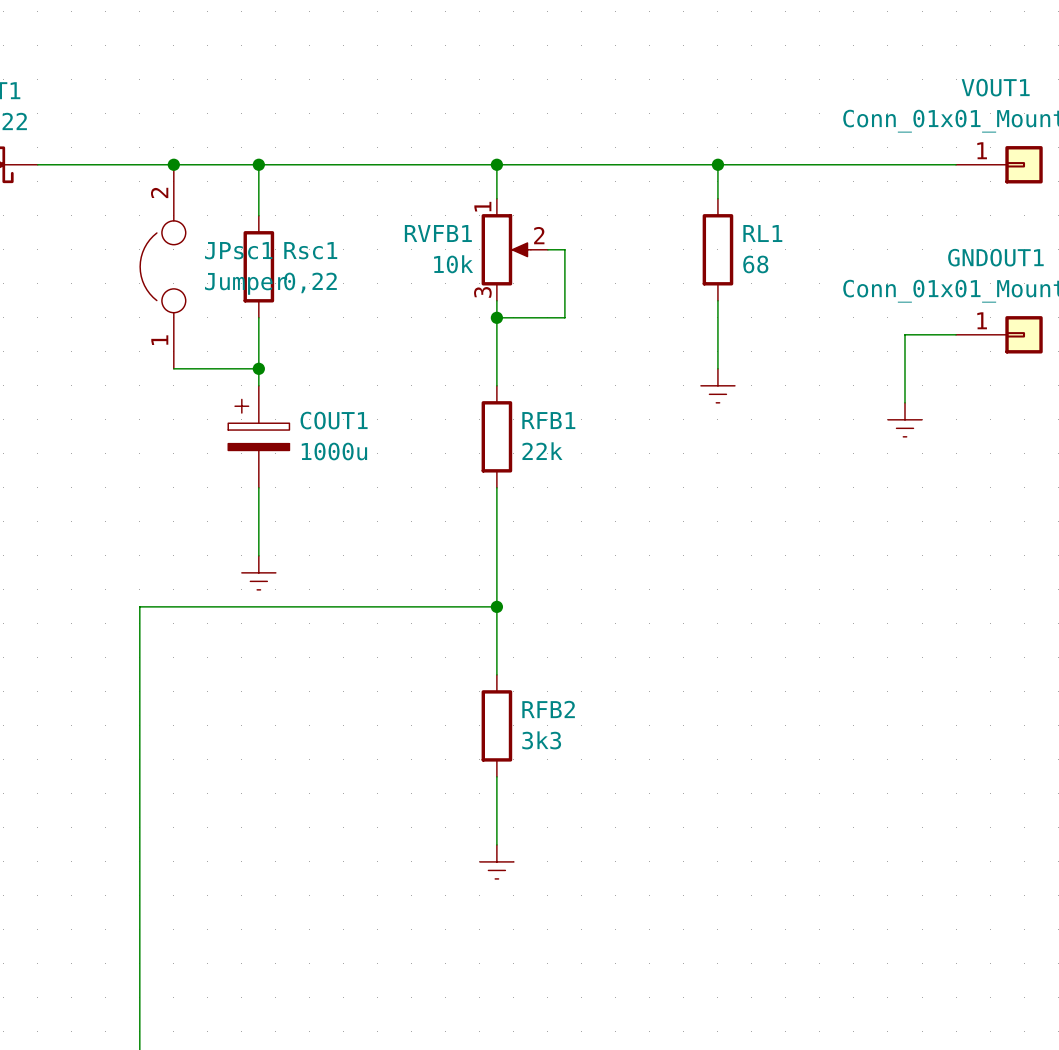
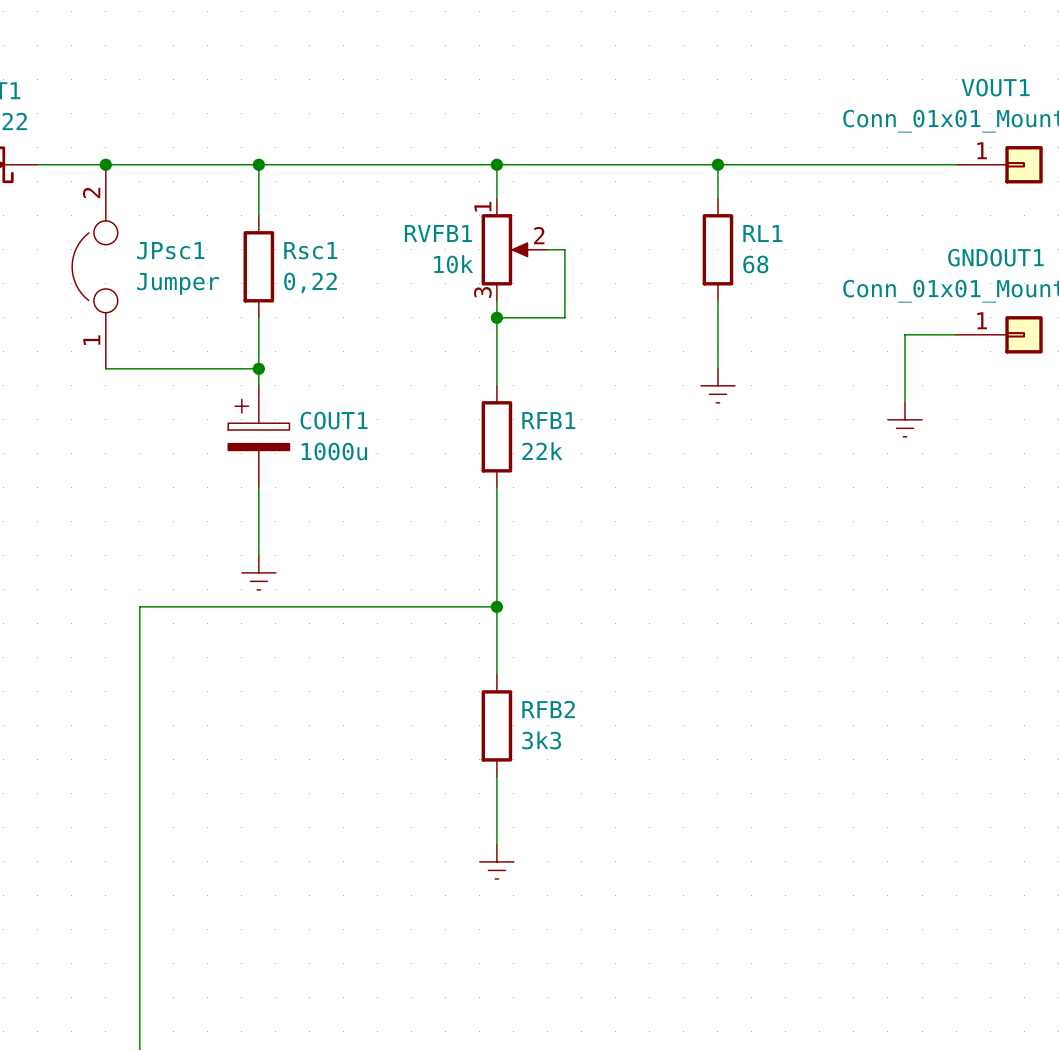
junction position: (173, 164) -> (105, 164)
JPsc1 position: (162, 266) -> (94, 266)
wire: none -> (105, 368) (173, 368)

